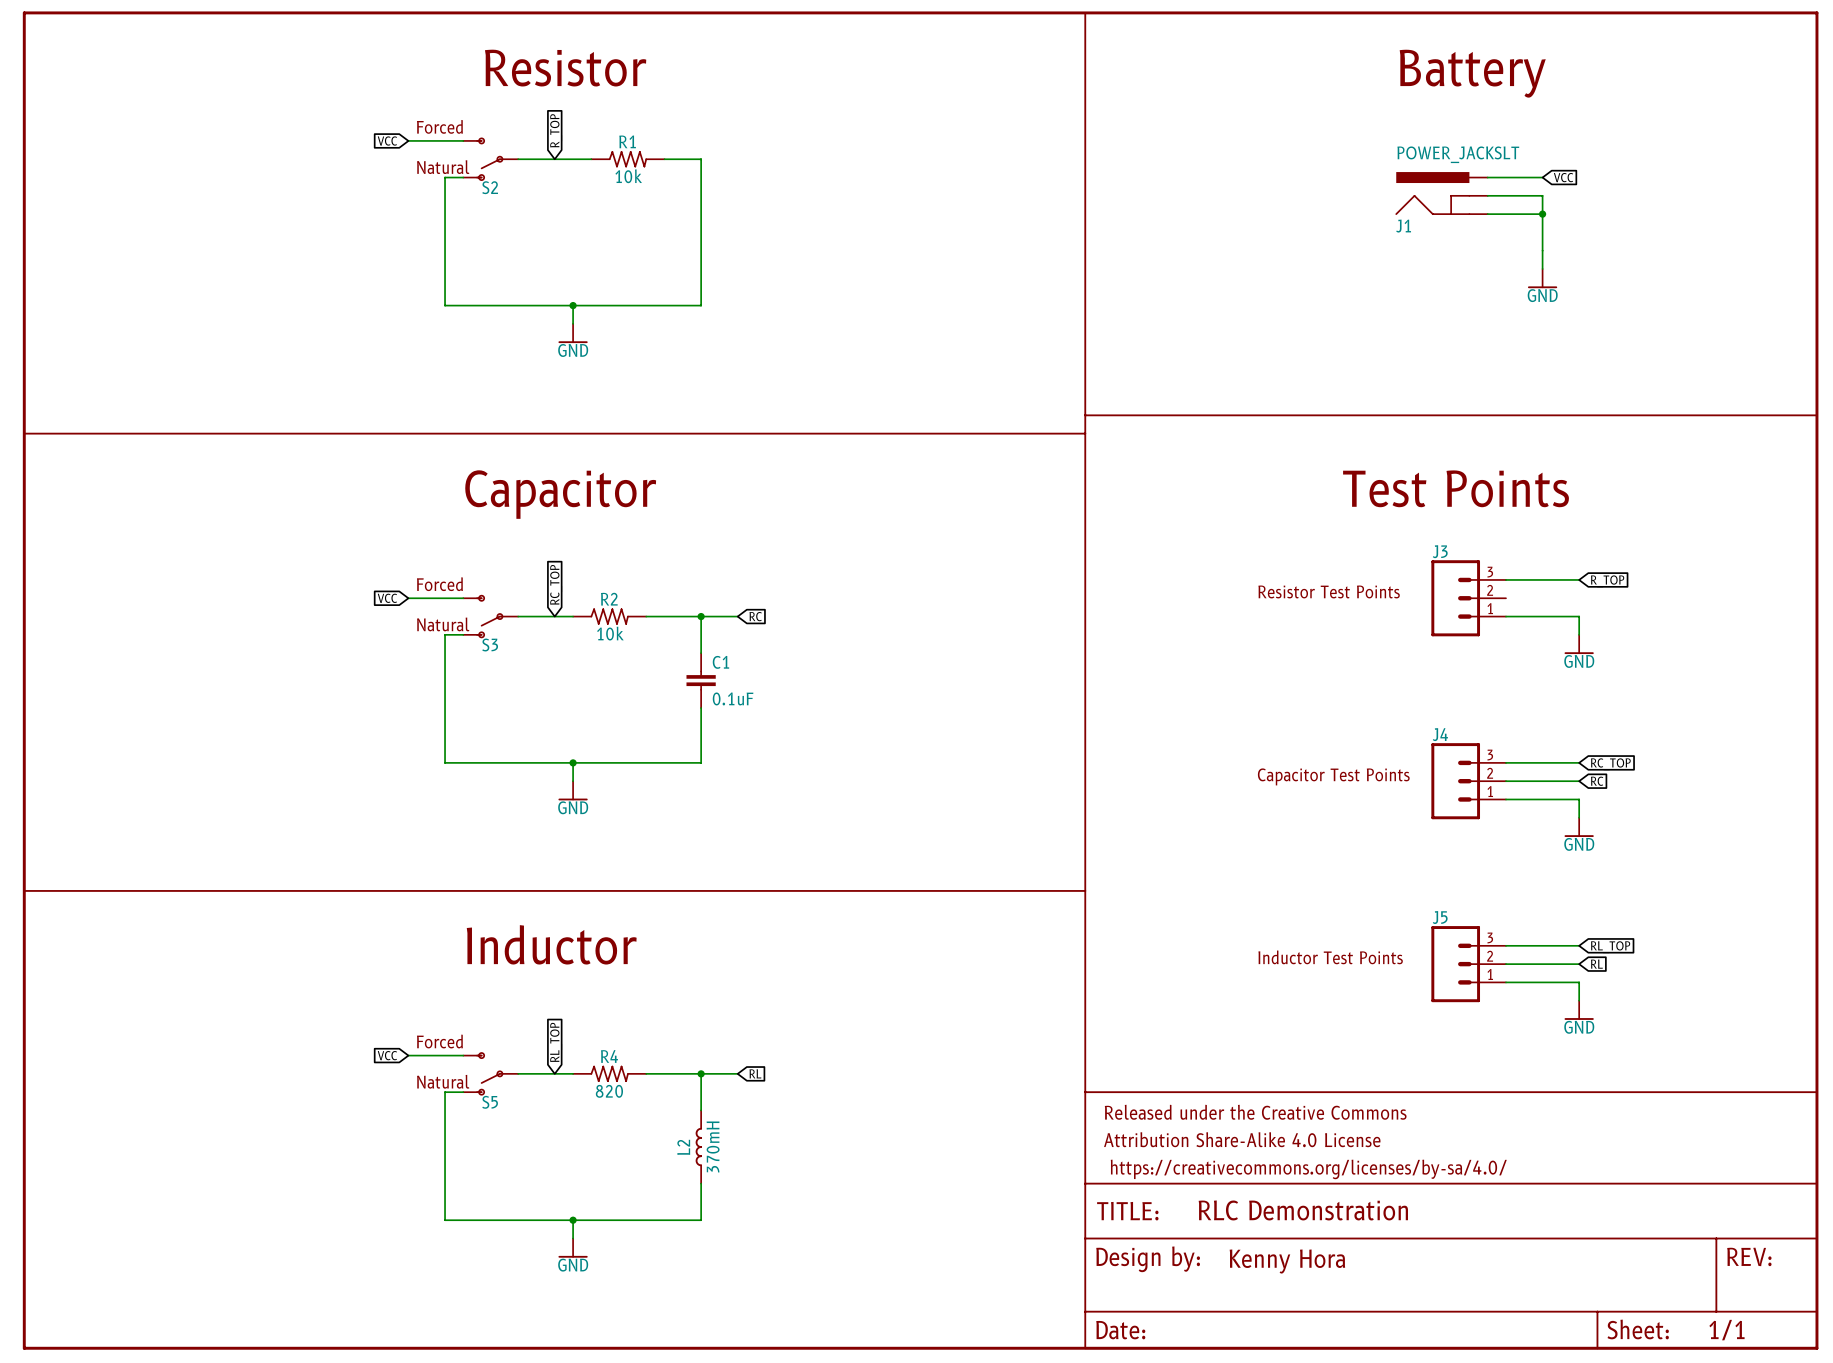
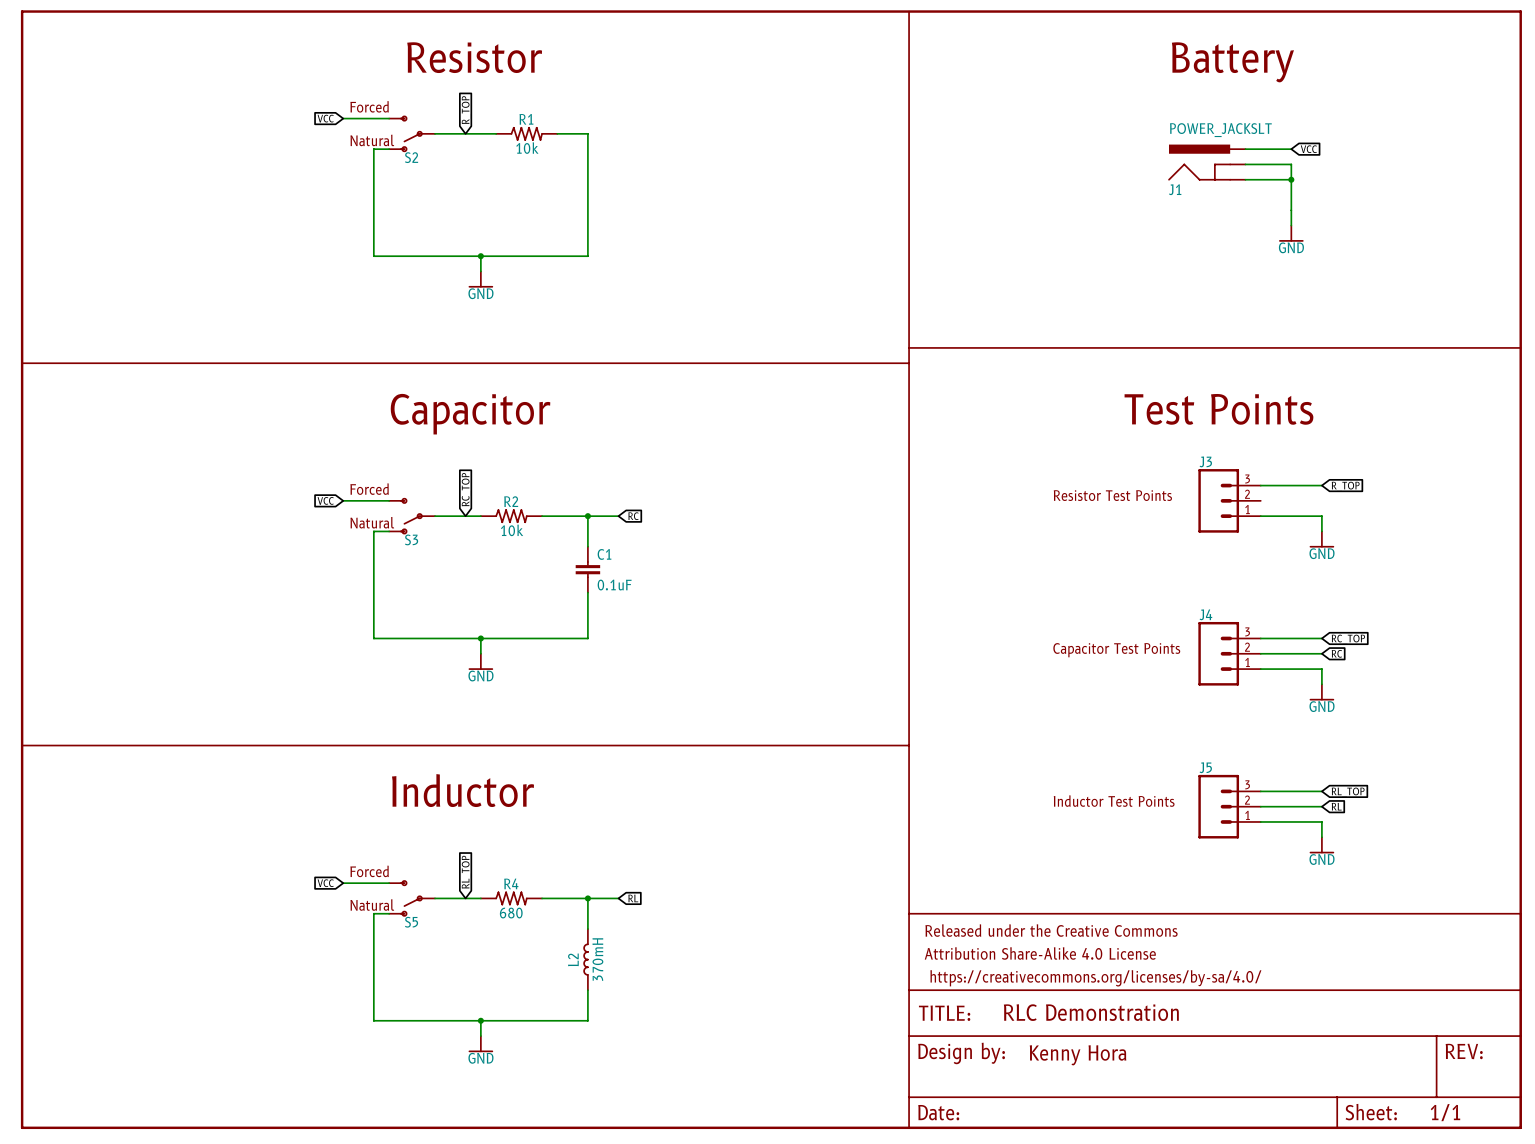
R4 value: 820 (609, 1091) -> 680 (511, 913)

